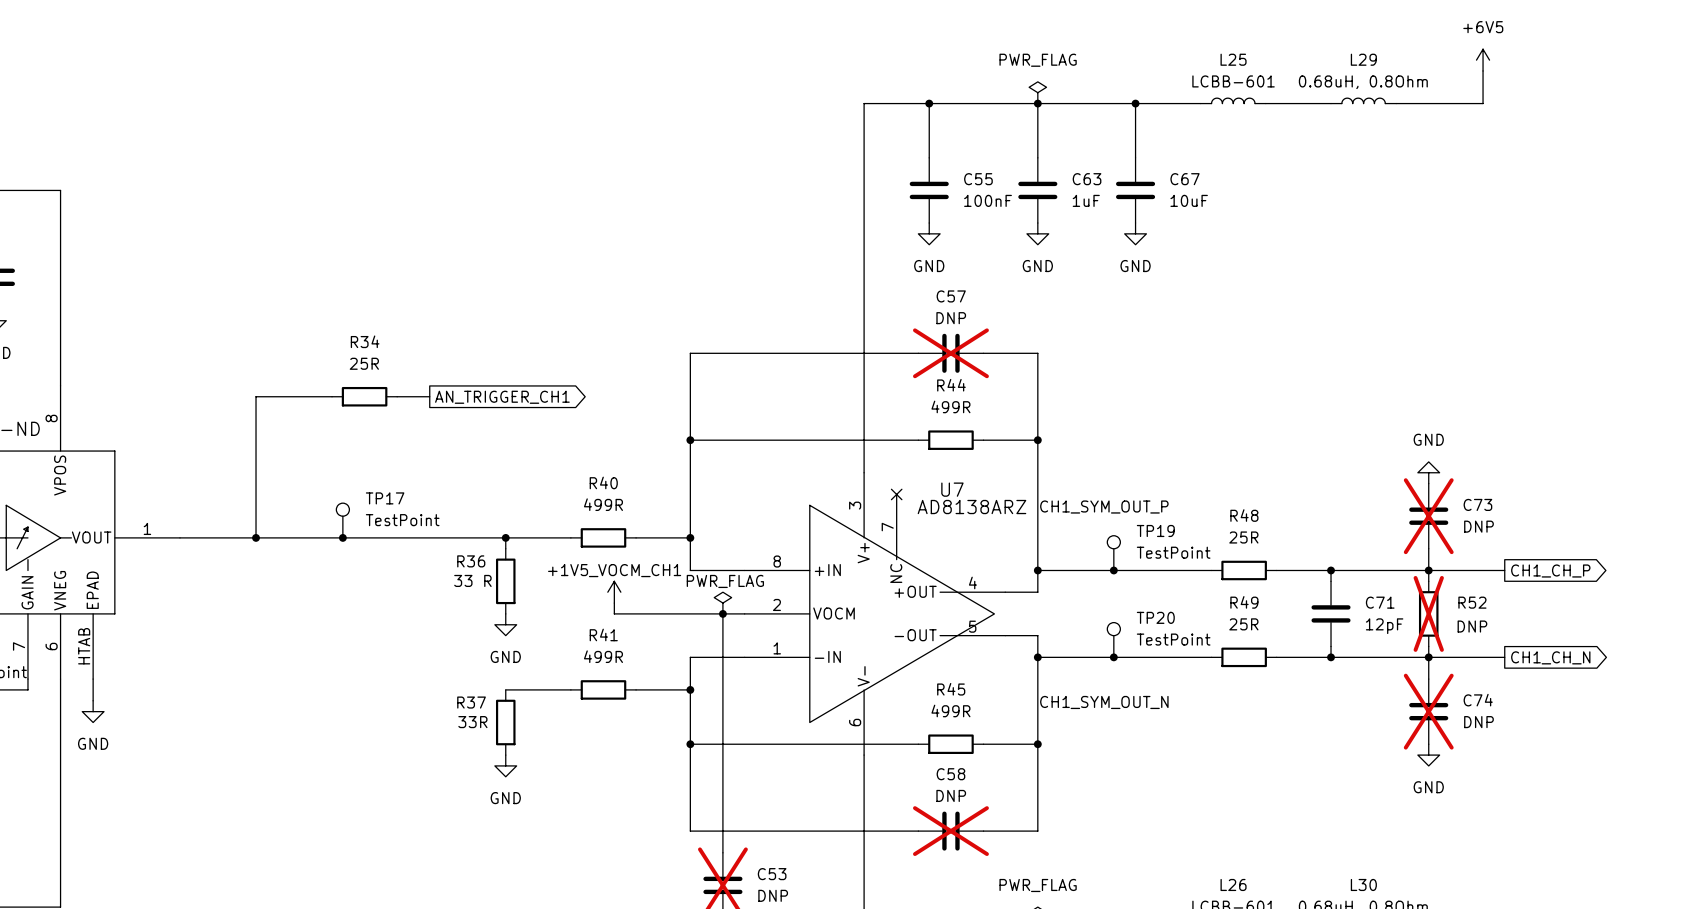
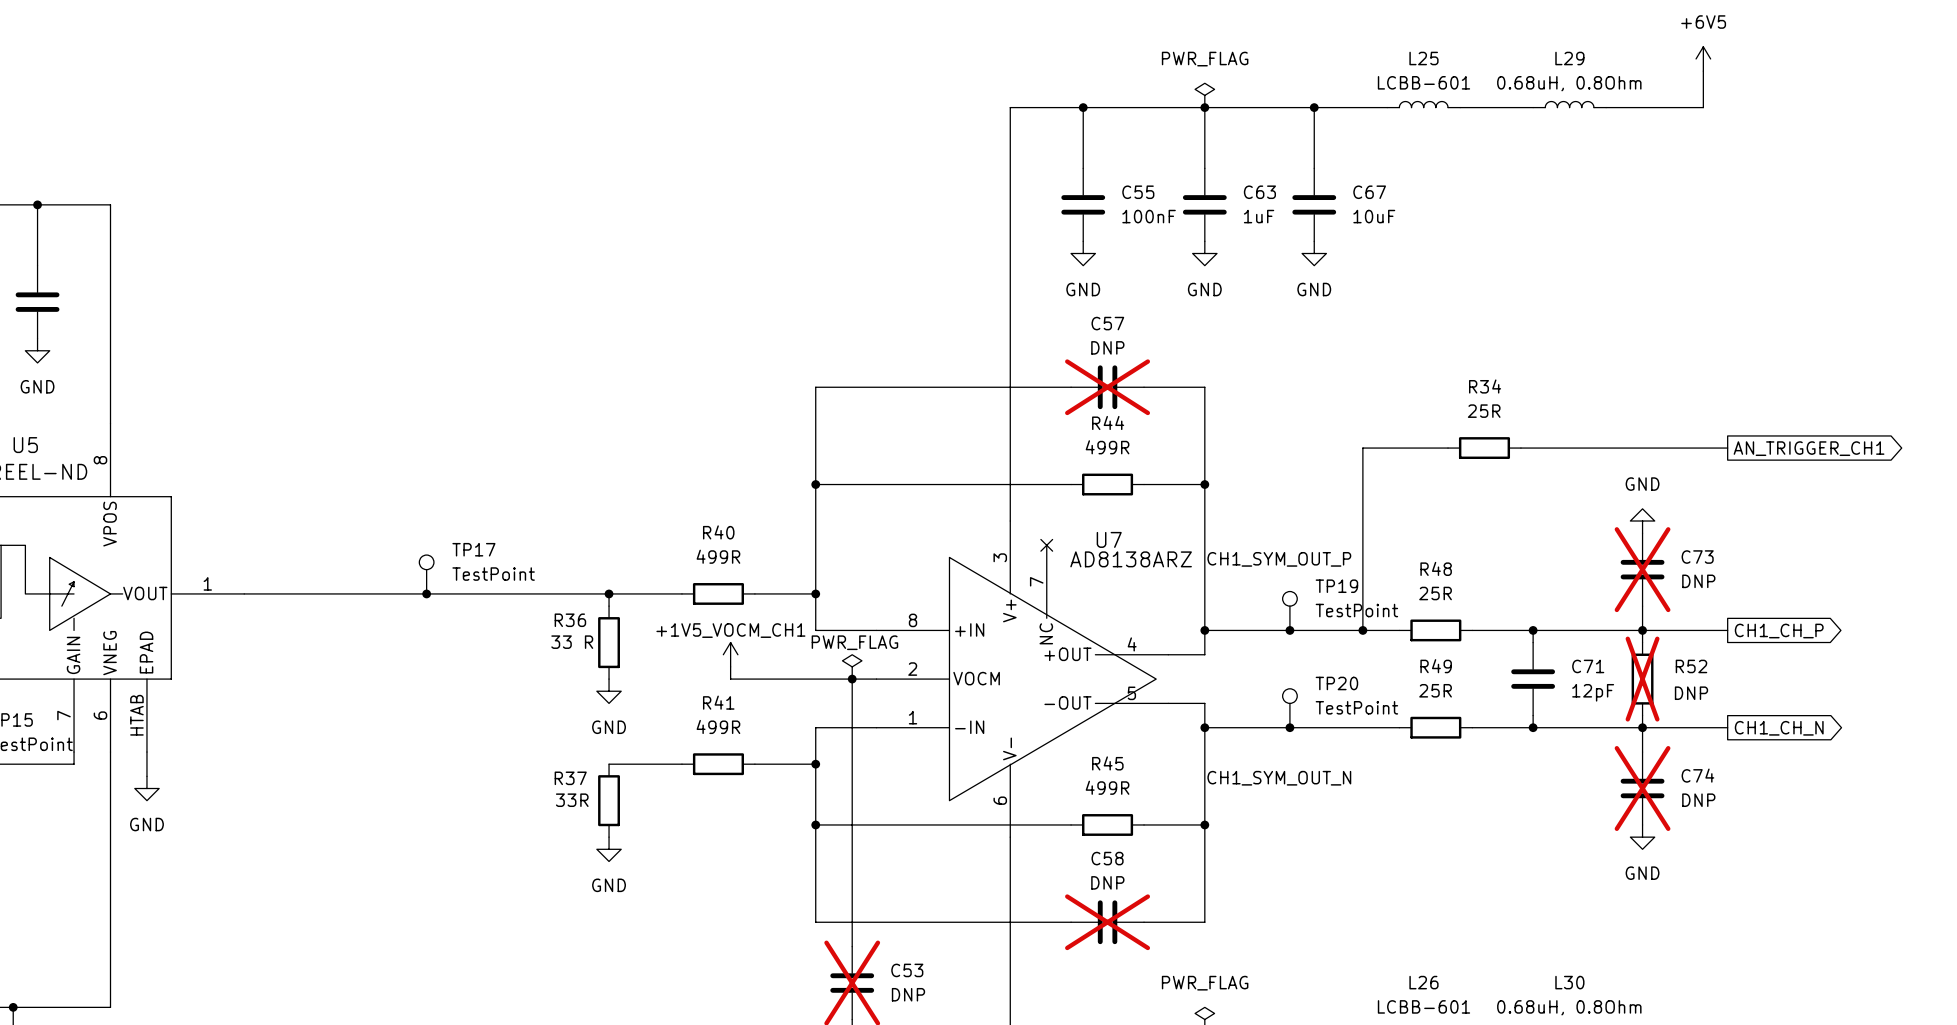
wire: (332, 396) (256, 396) (256, 537) -> none
R34 position: (364, 396) -> (1484, 448)
wire: (397, 396) (429, 396) -> none
global label: AN_TRIGGER_CH1 (502, 397) -> none
wire: none -> (1448, 448) (1362, 448) (1362, 630)
wire: none -> (1520, 448) (1727, 448)
global label: none -> AN_TRIGGER_CH1 (1809, 448)
junction: (256, 537) -> none
junction: none -> (1362, 630)

